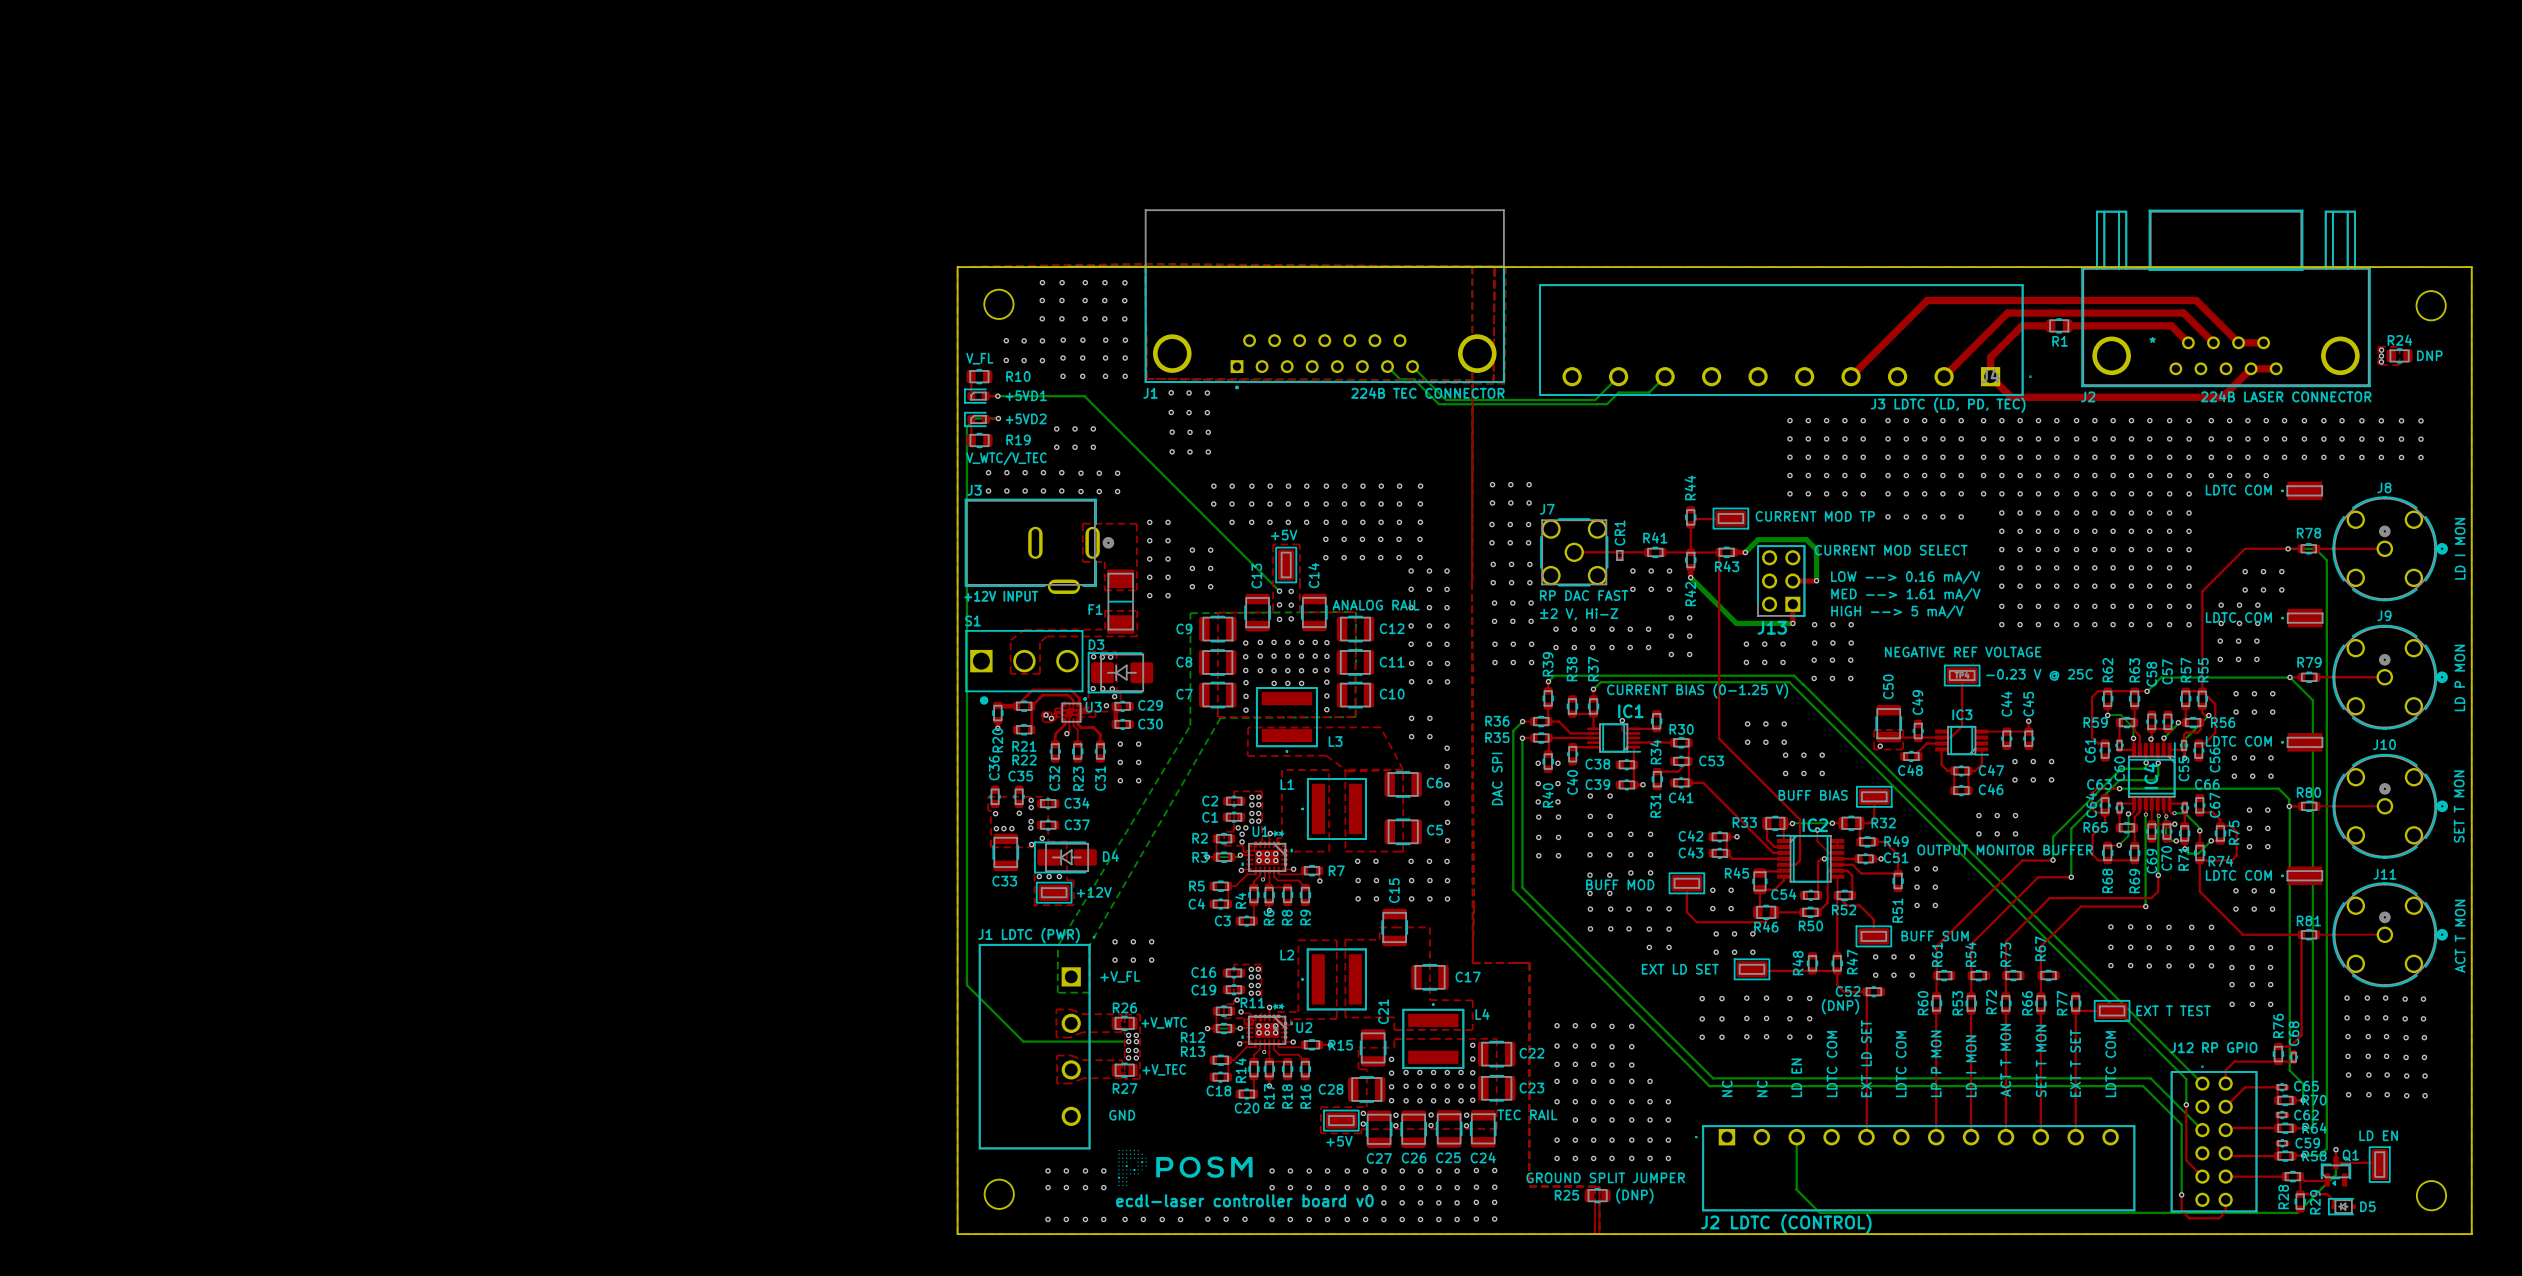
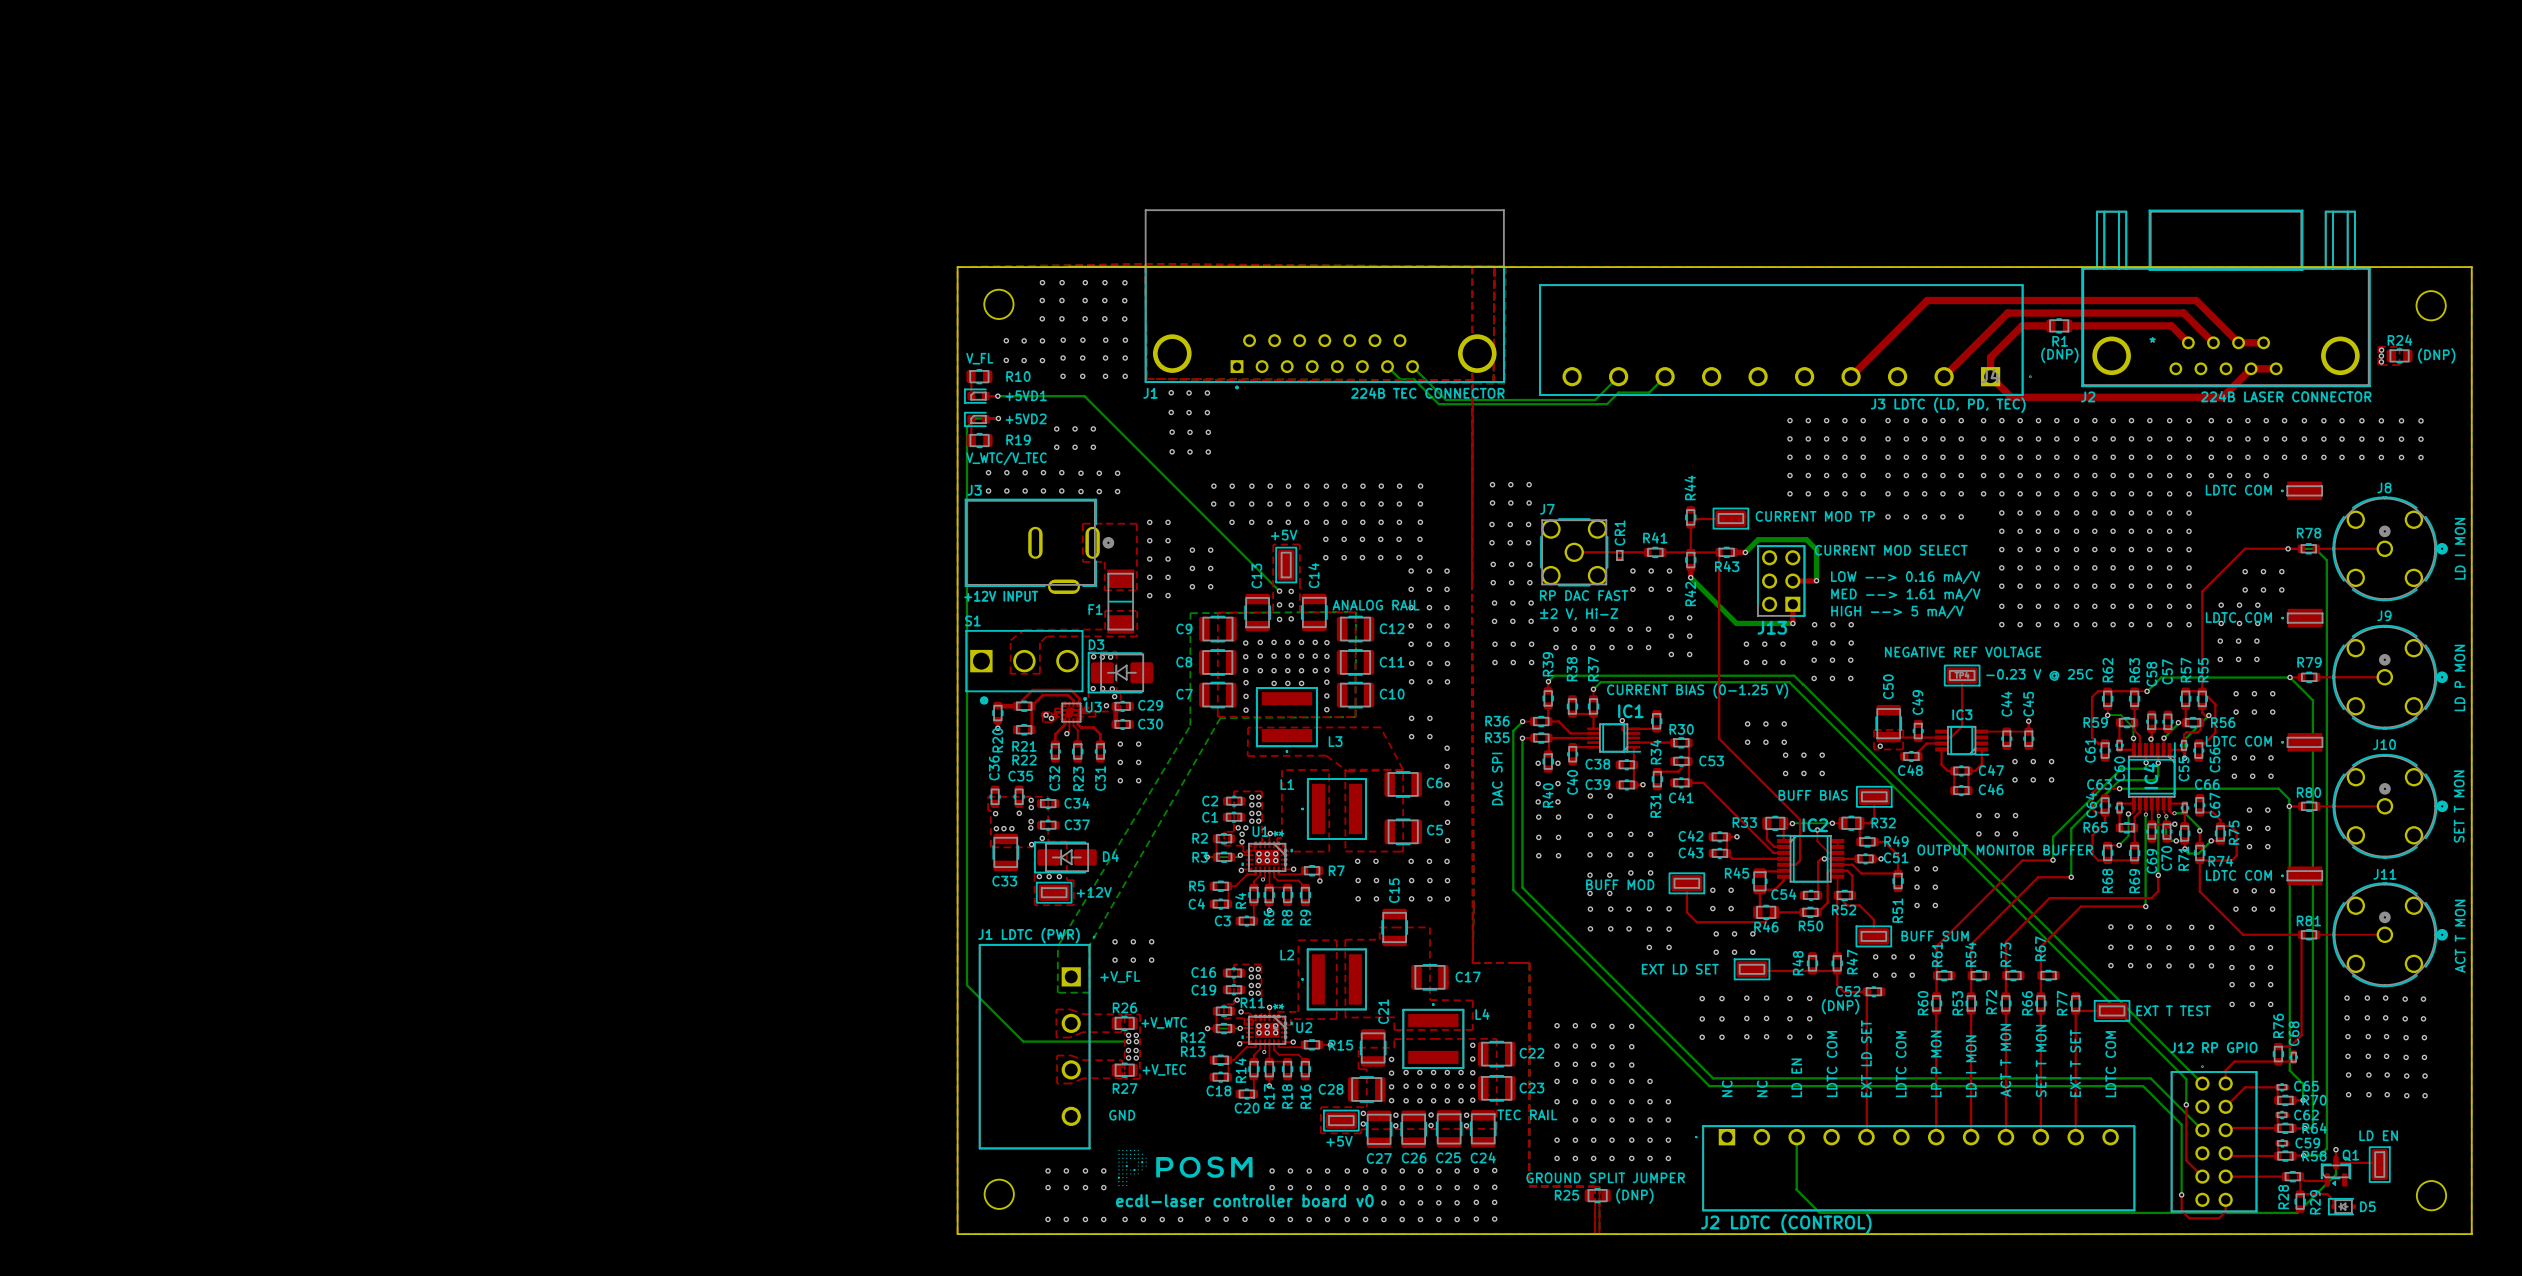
text: none -> (DNP) (2059, 355)
text: DNP (2429, 355) -> (DNP) (2436, 355)

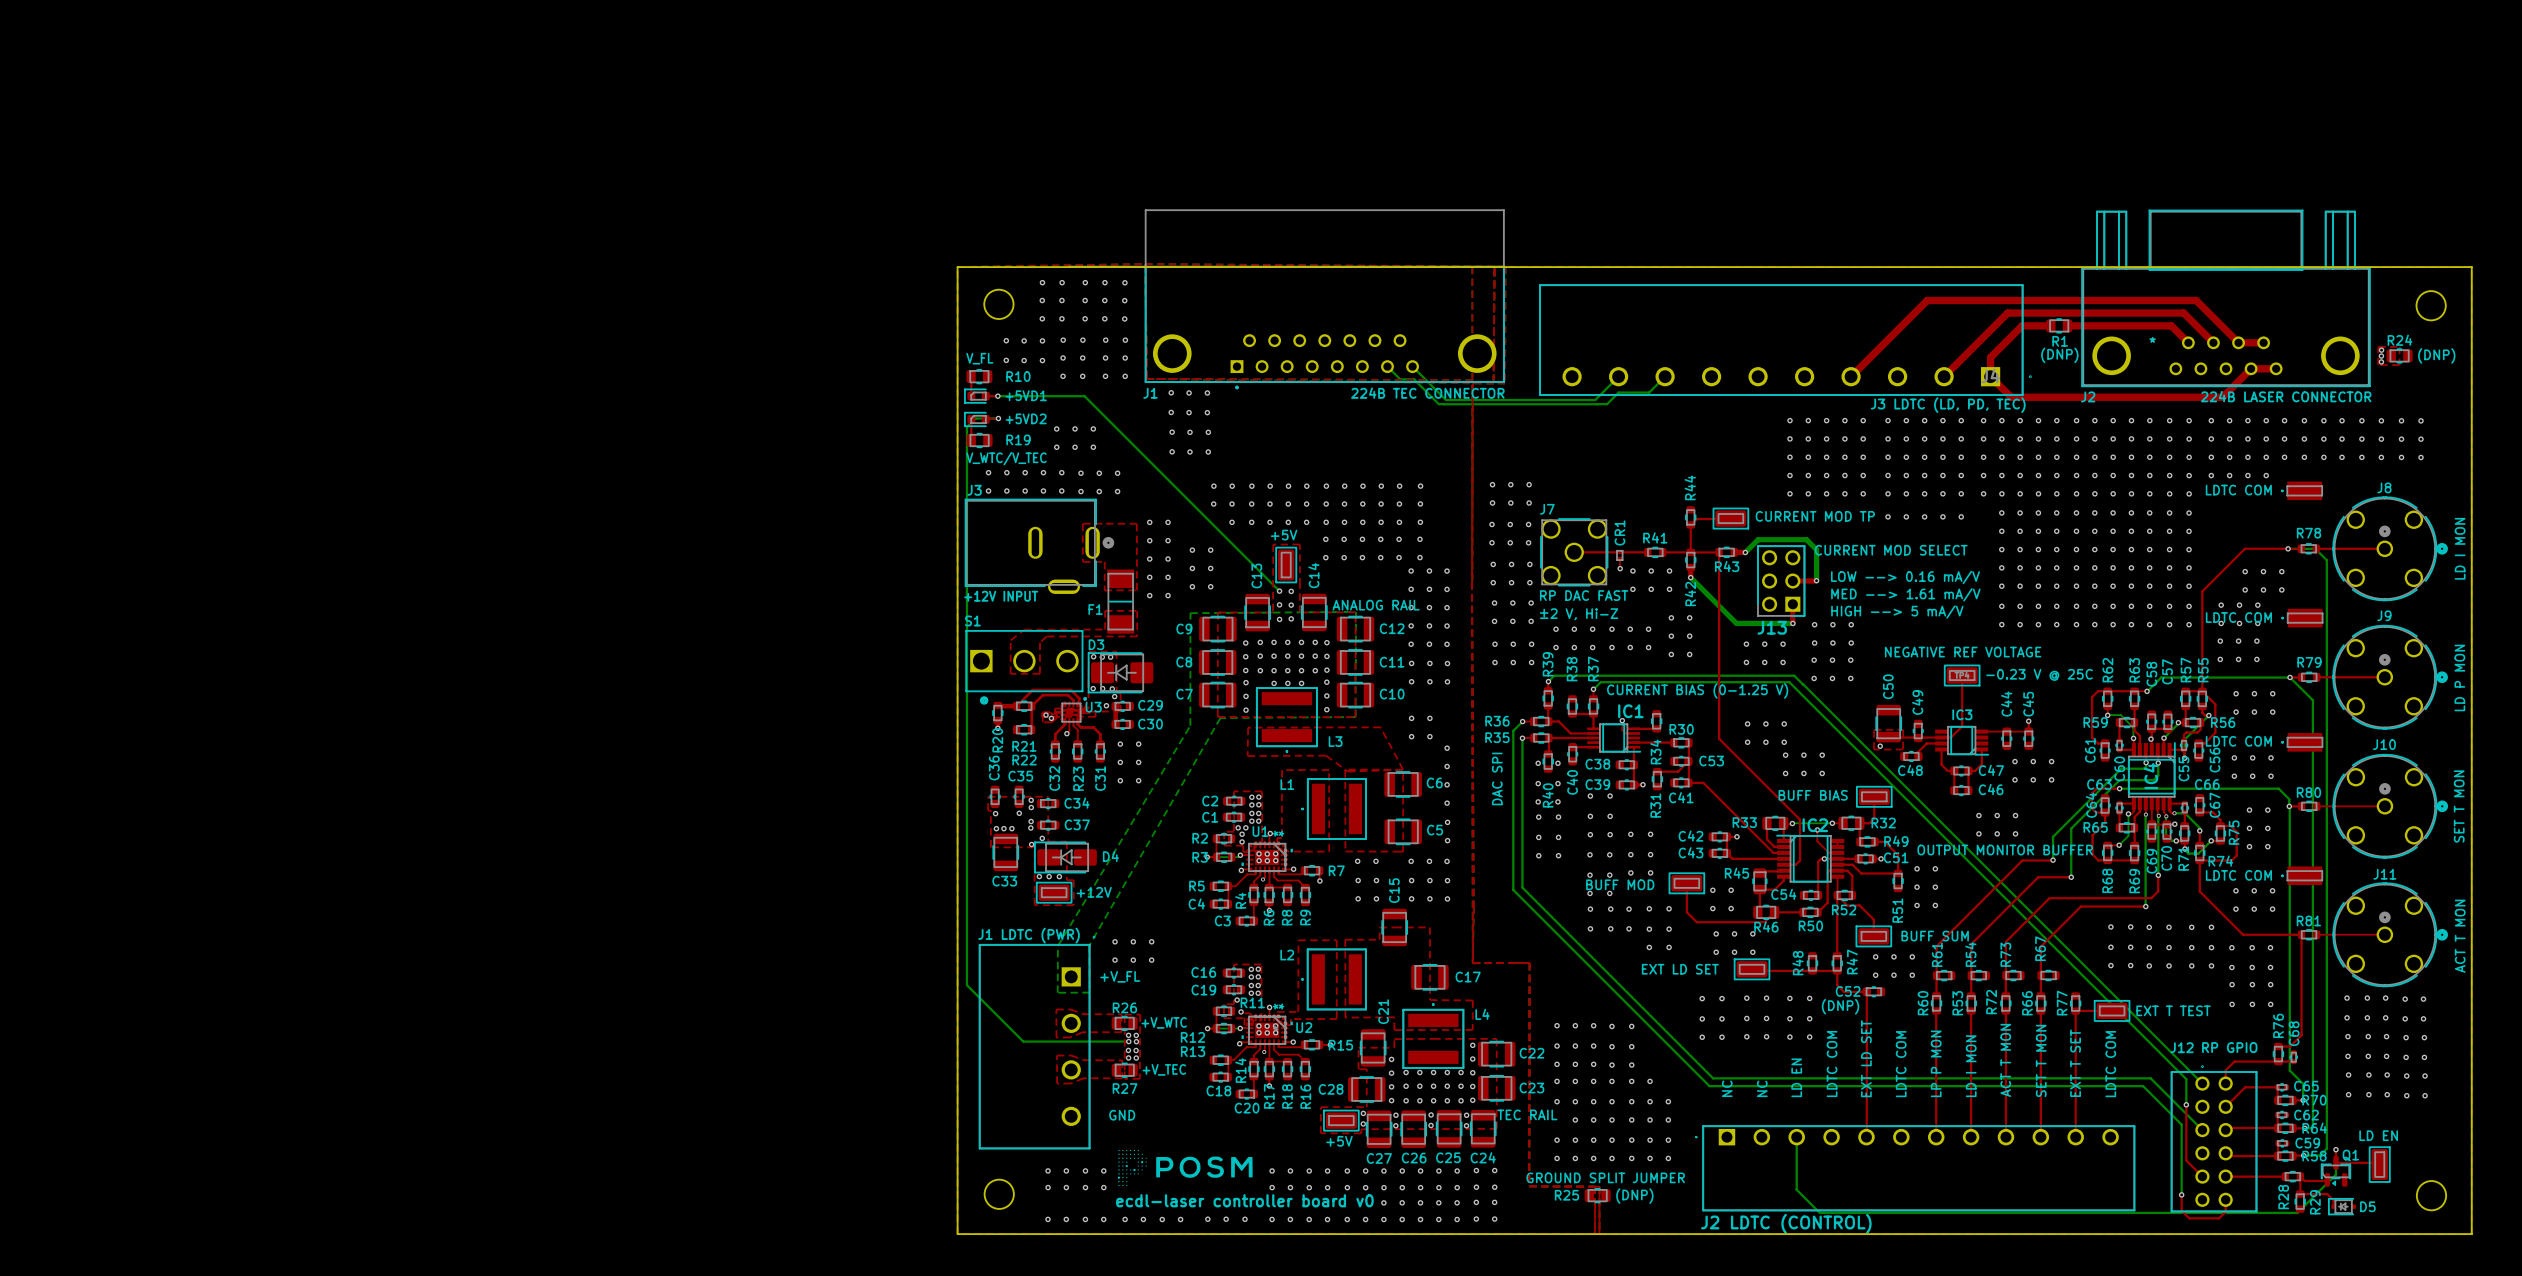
top track: none -> (1619, 558) (1619, 565)
via: none -> (1620, 568)

